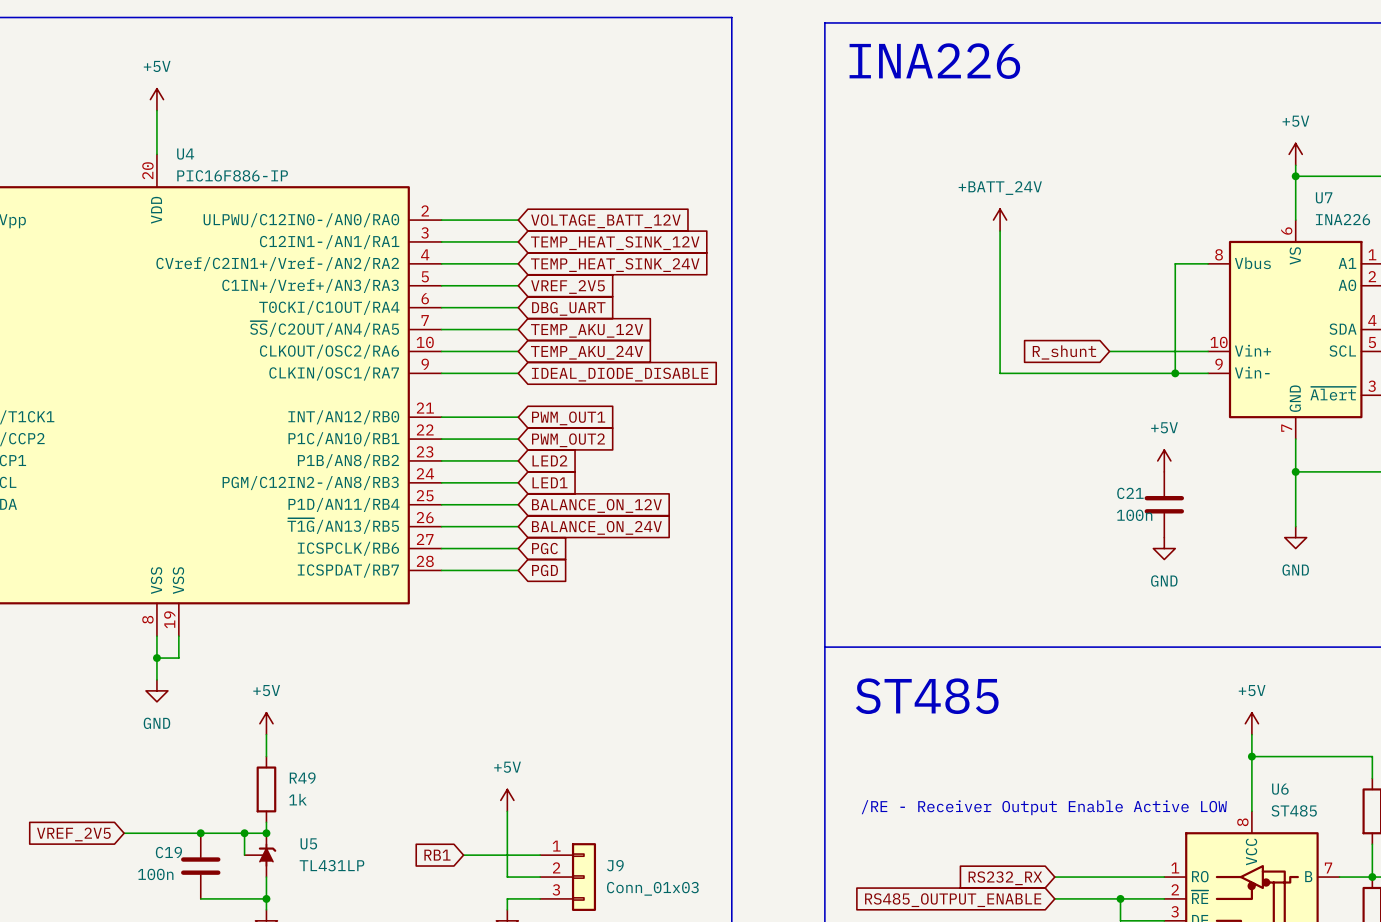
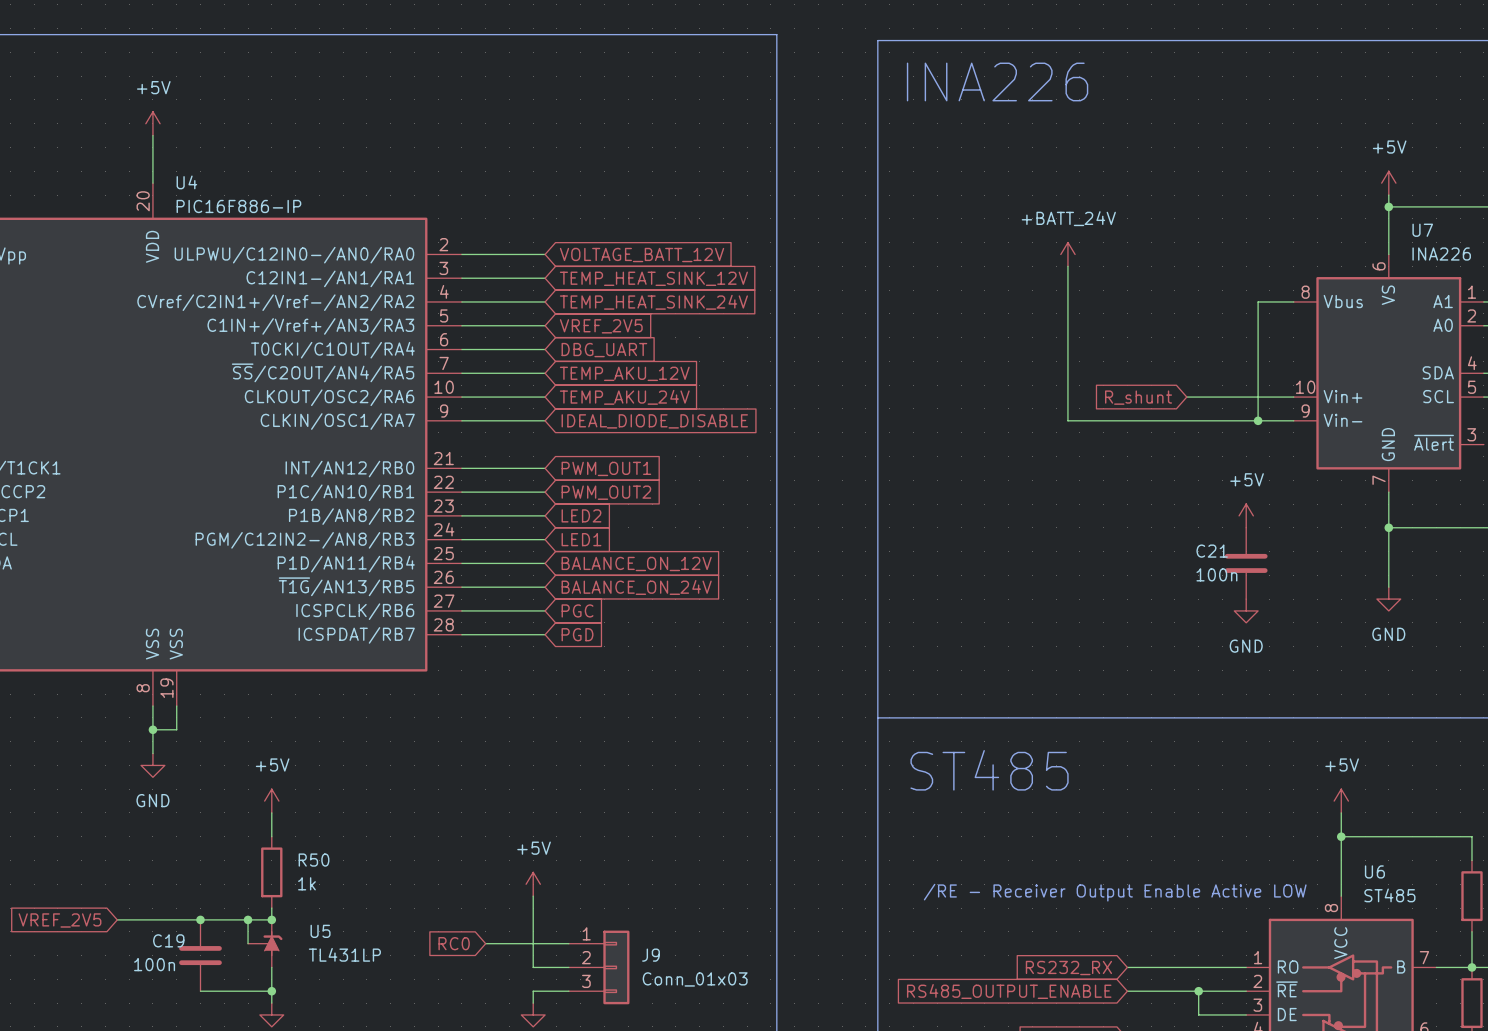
R49 name: R49 (302, 777) -> R50 (314, 860)
global label: RB1 (437, 855) -> RC0 (454, 943)

